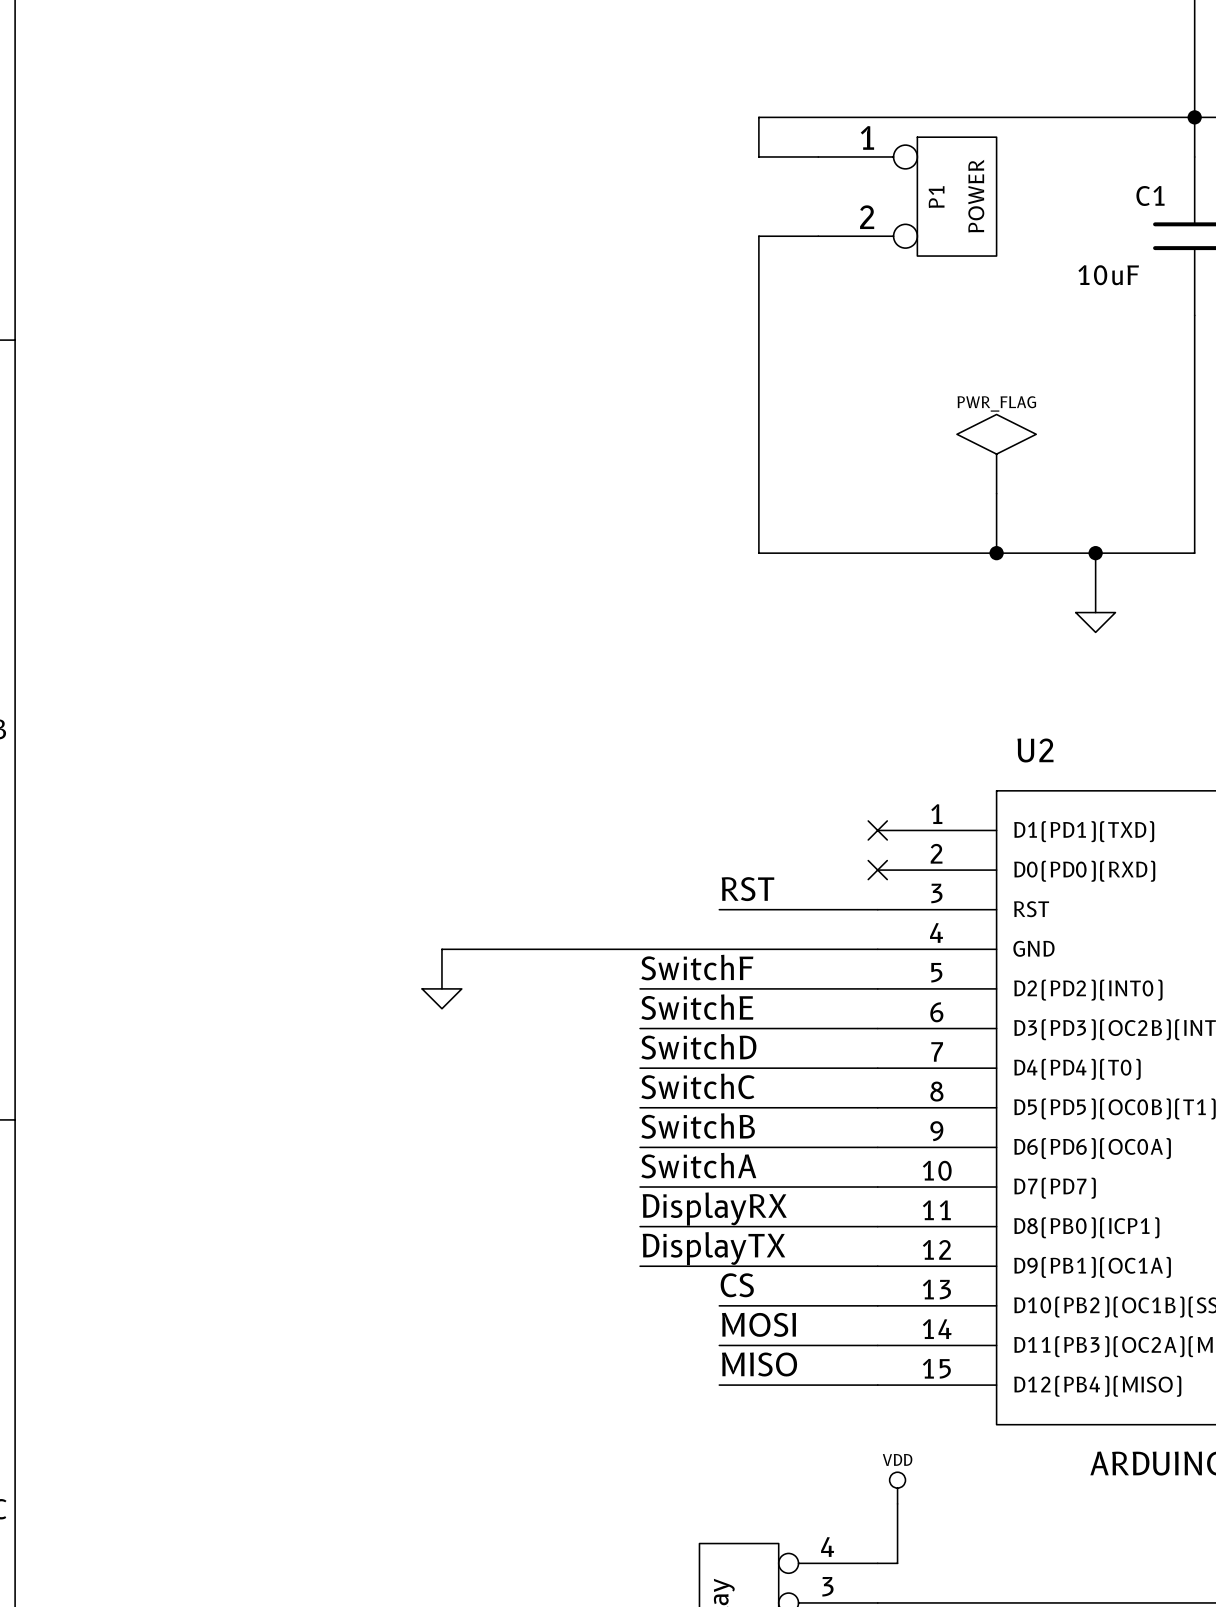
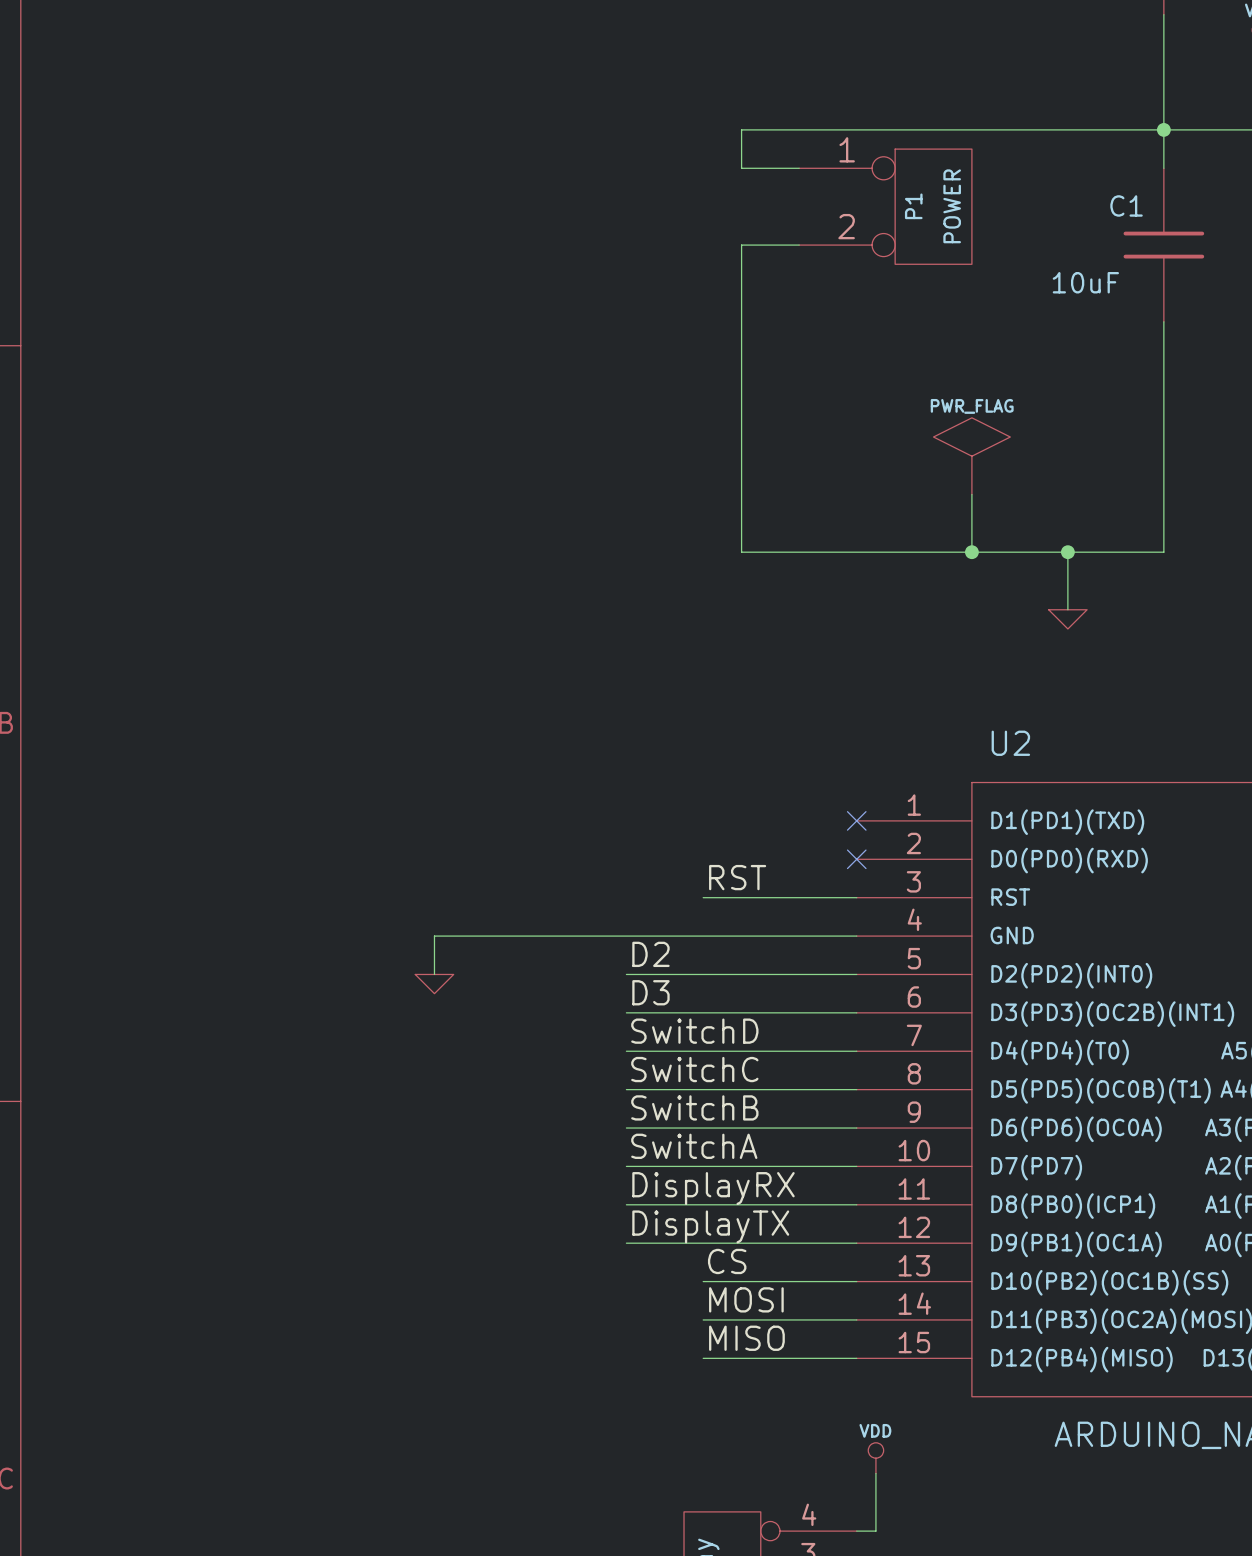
label: SwitchF (697, 967) -> D2 (650, 954)
label: SwitchE (697, 1007) -> D3 (650, 992)

